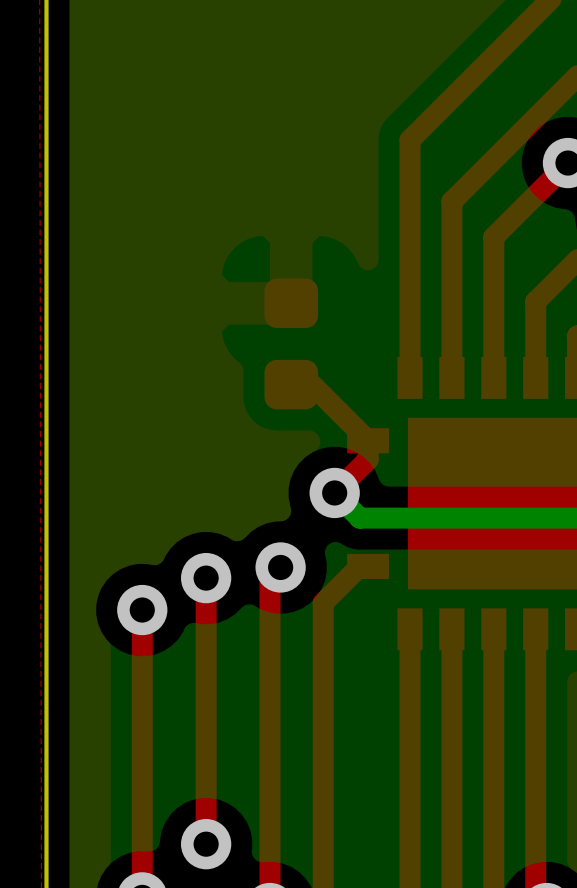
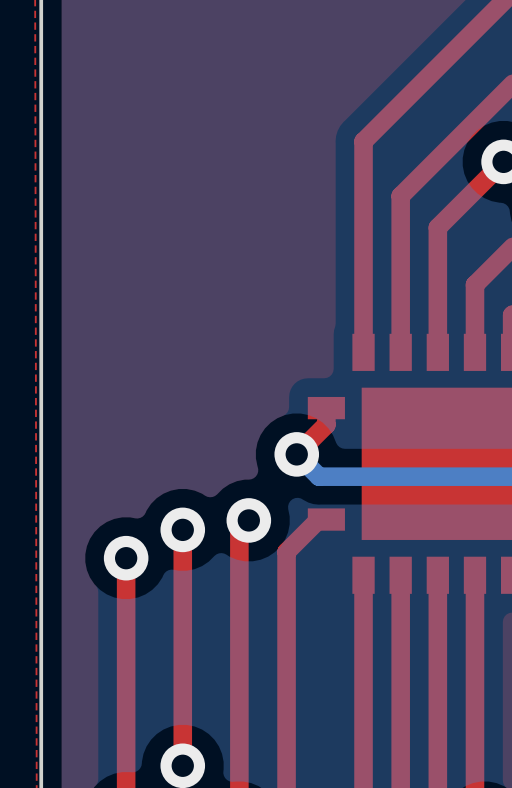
part: (291, 343) -> none
top track: (312, 385) (368, 440) -> none

